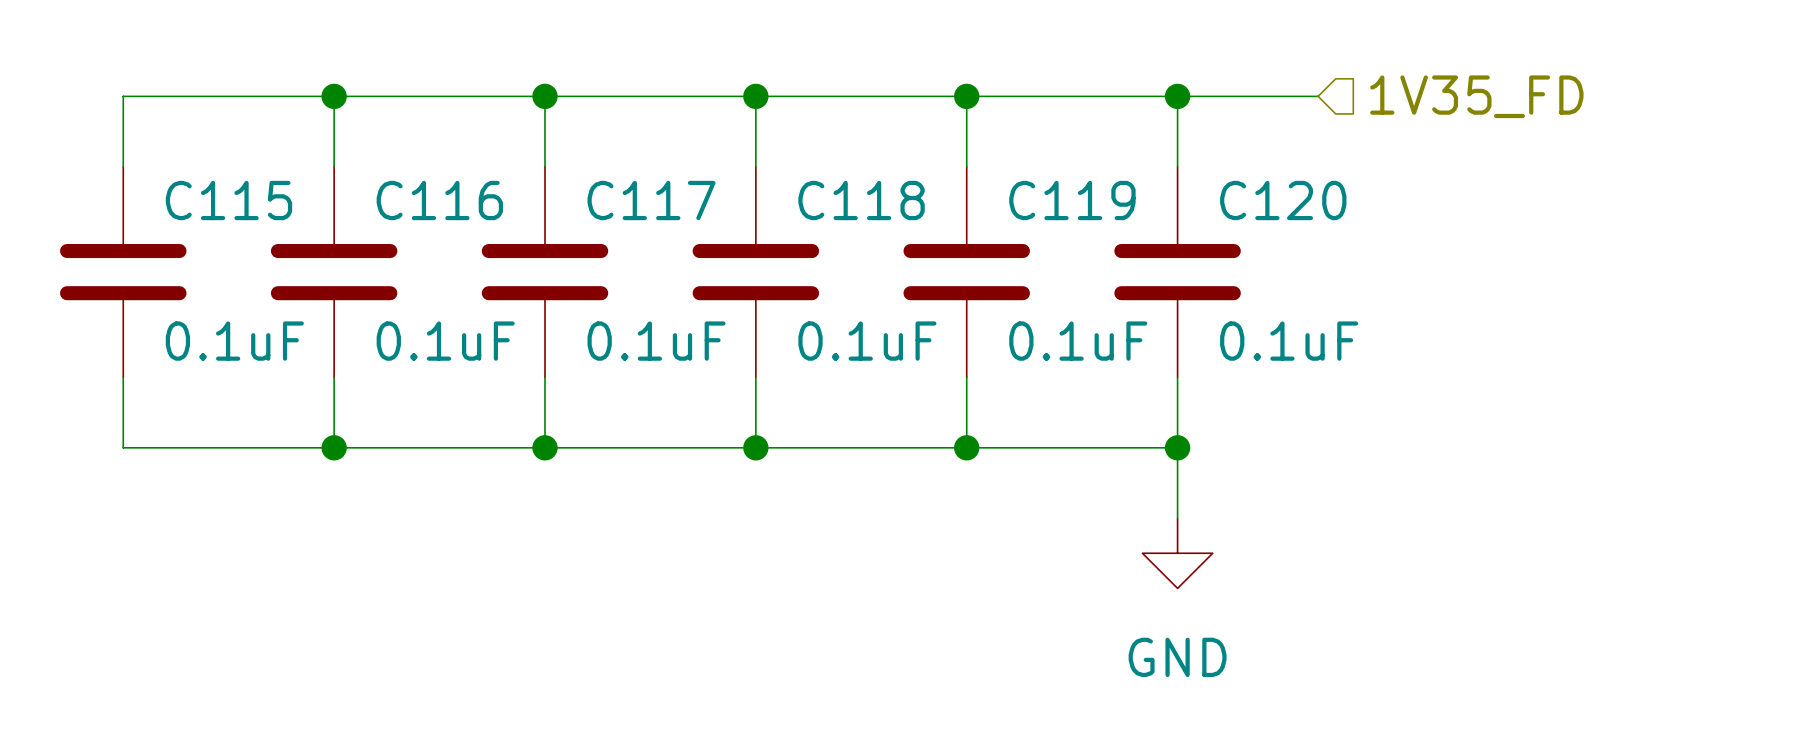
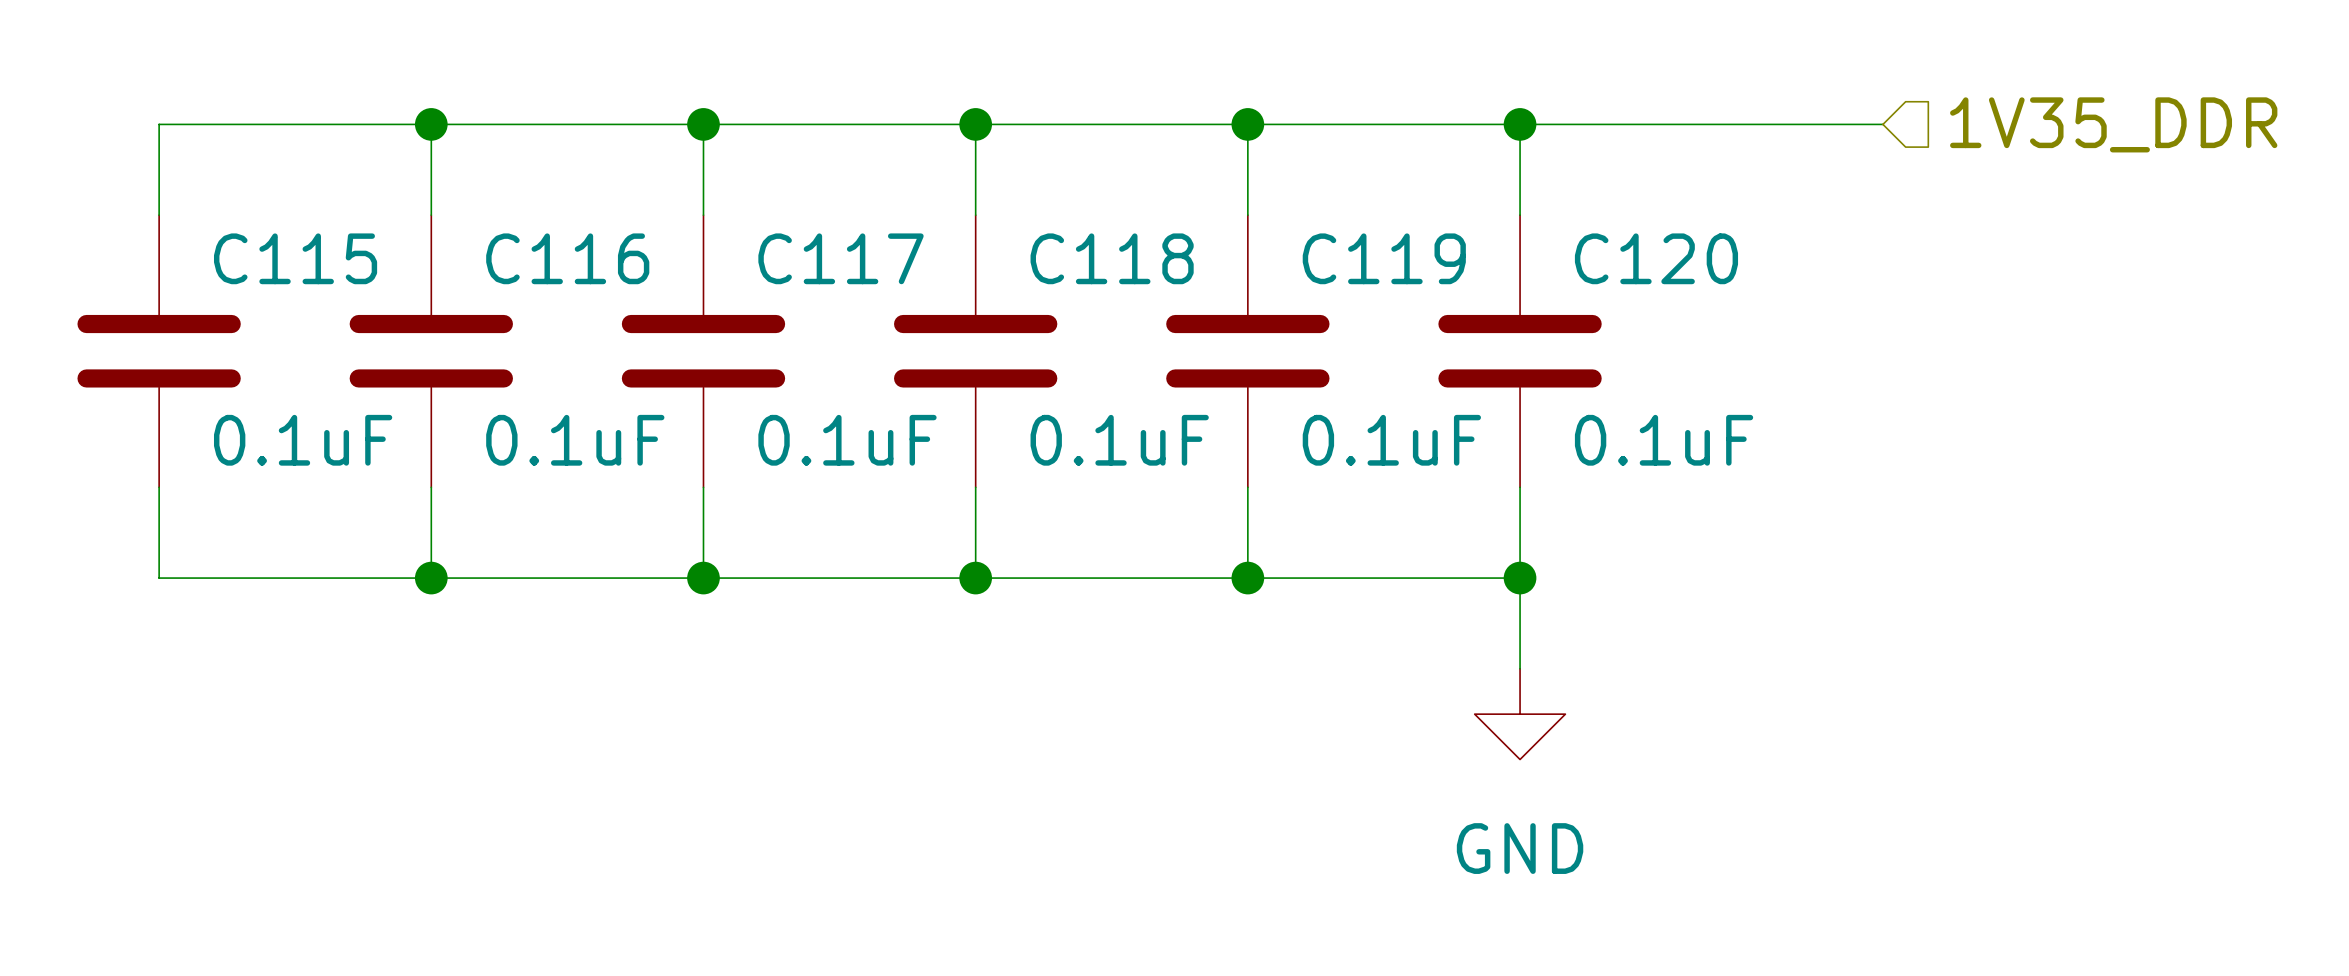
wire: none -> (1701, 124) (1882, 124)
hierarchical label: 1V35_FD (1476, 96) -> 1V35_DDR (2113, 124)

